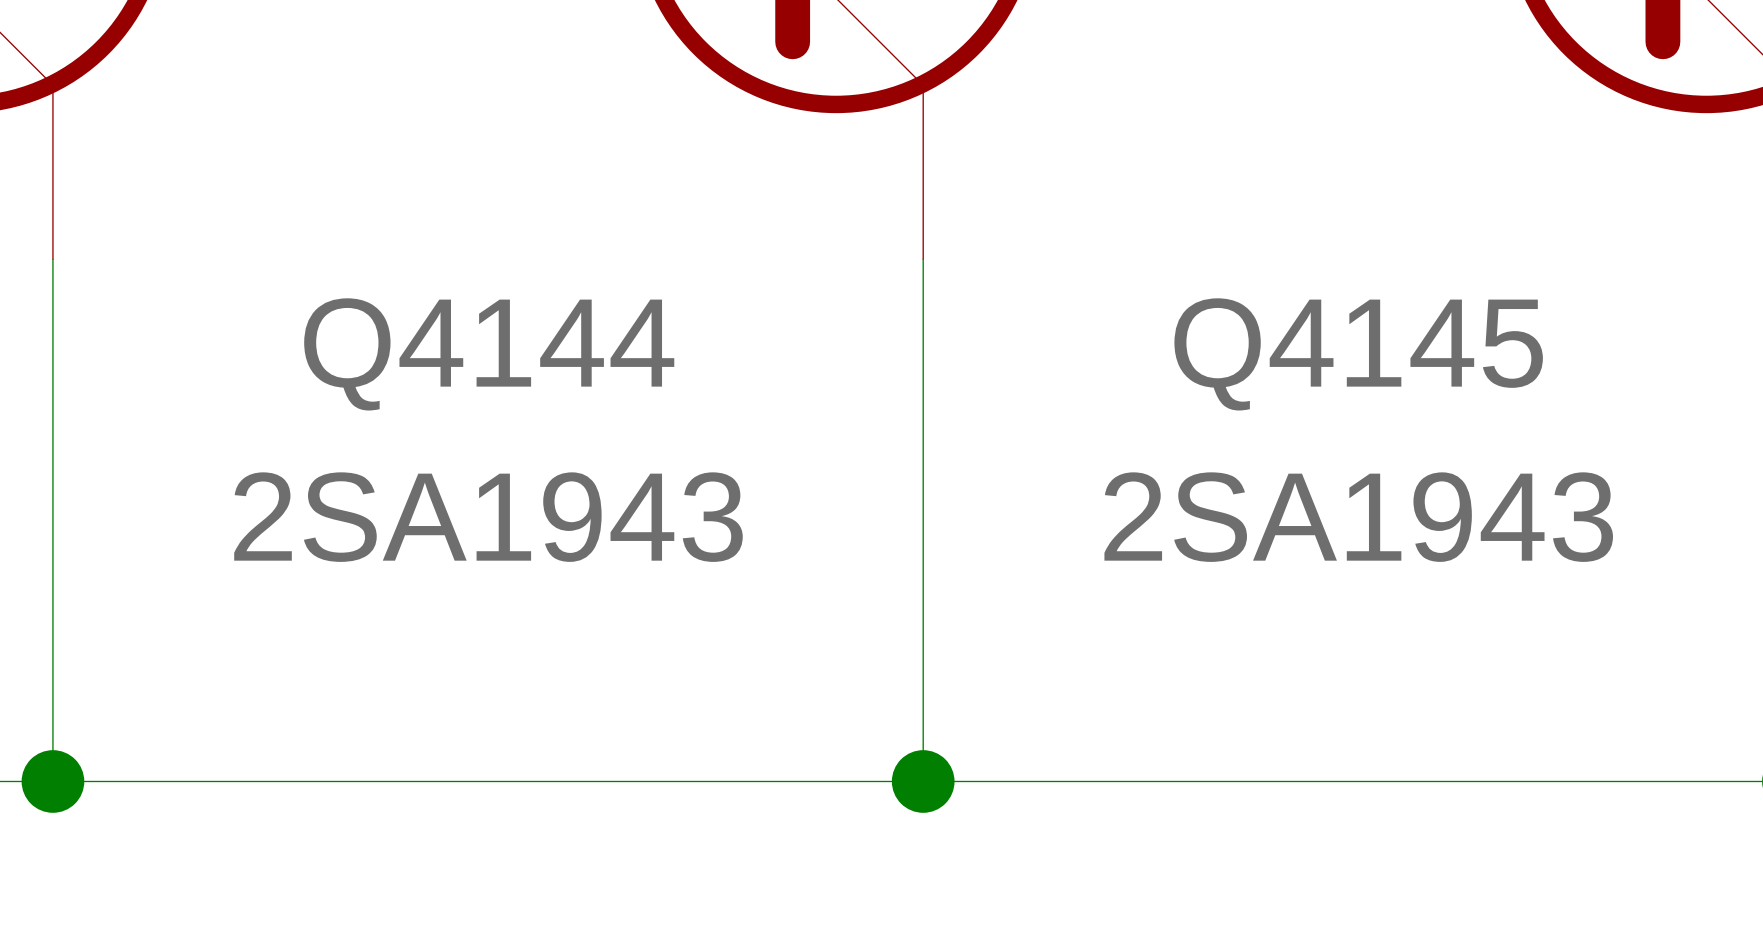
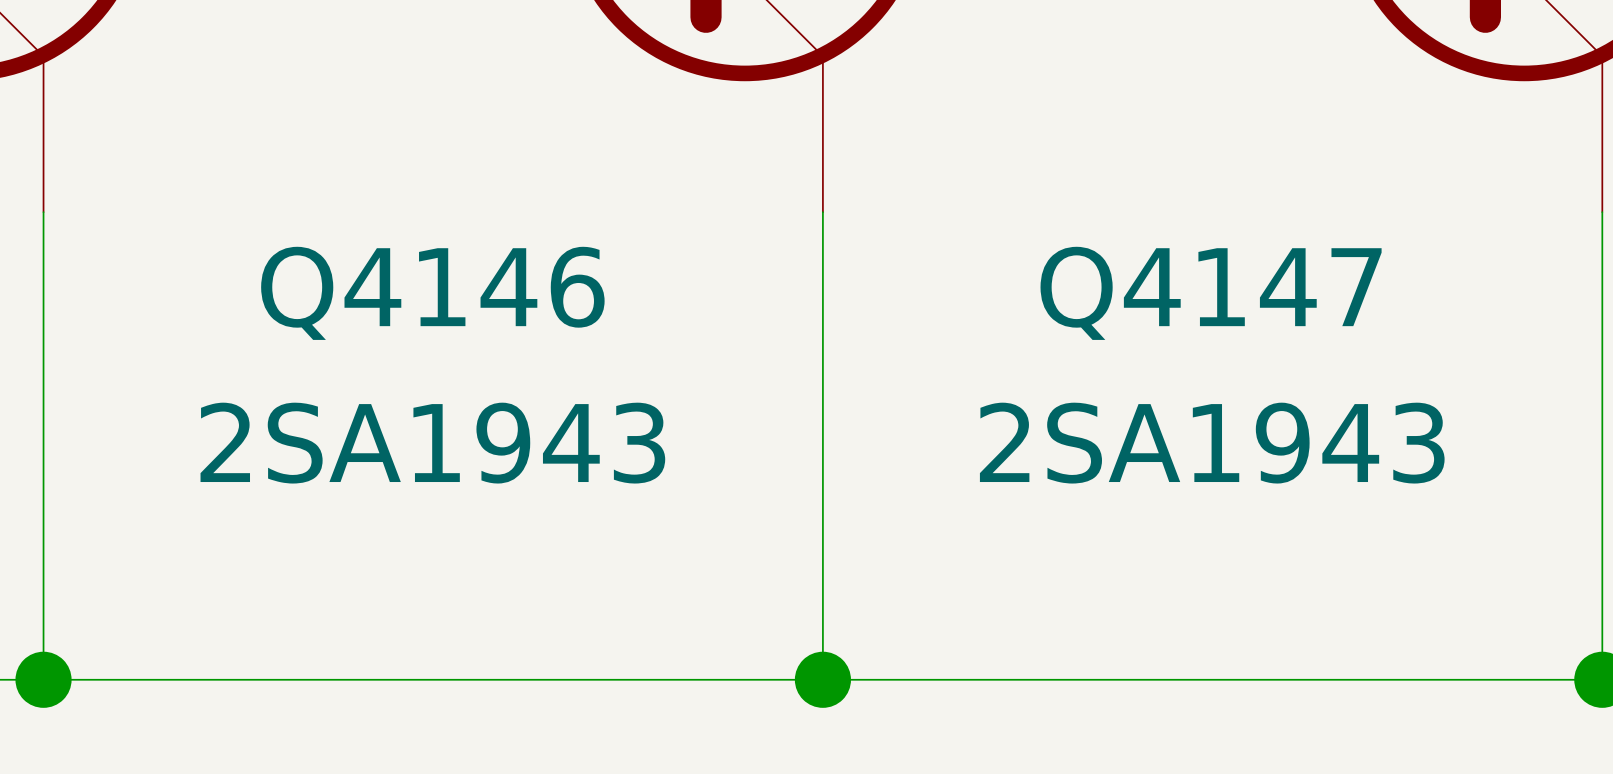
Q4144 name: Q4144 (489, 354) -> Q4146 (432, 293)
Q4145 name: Q4145 (1358, 354) -> Q4147 (1211, 293)

